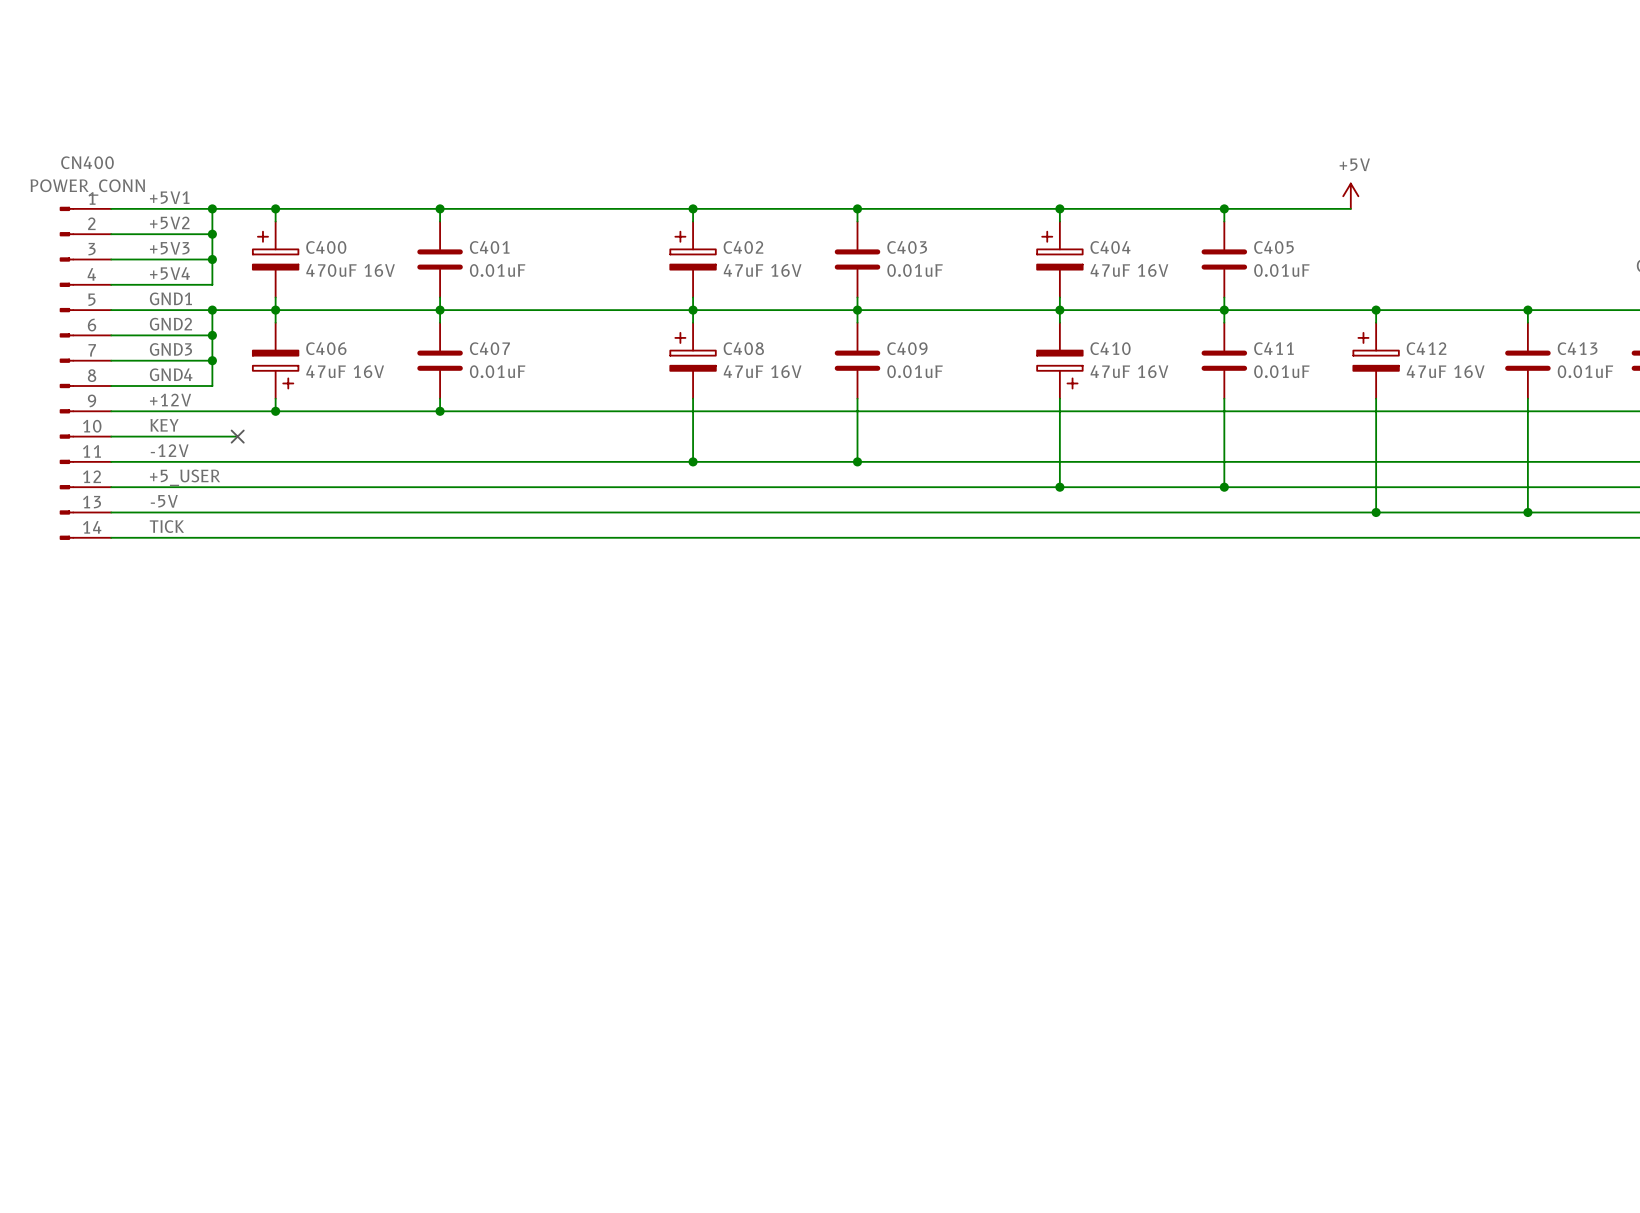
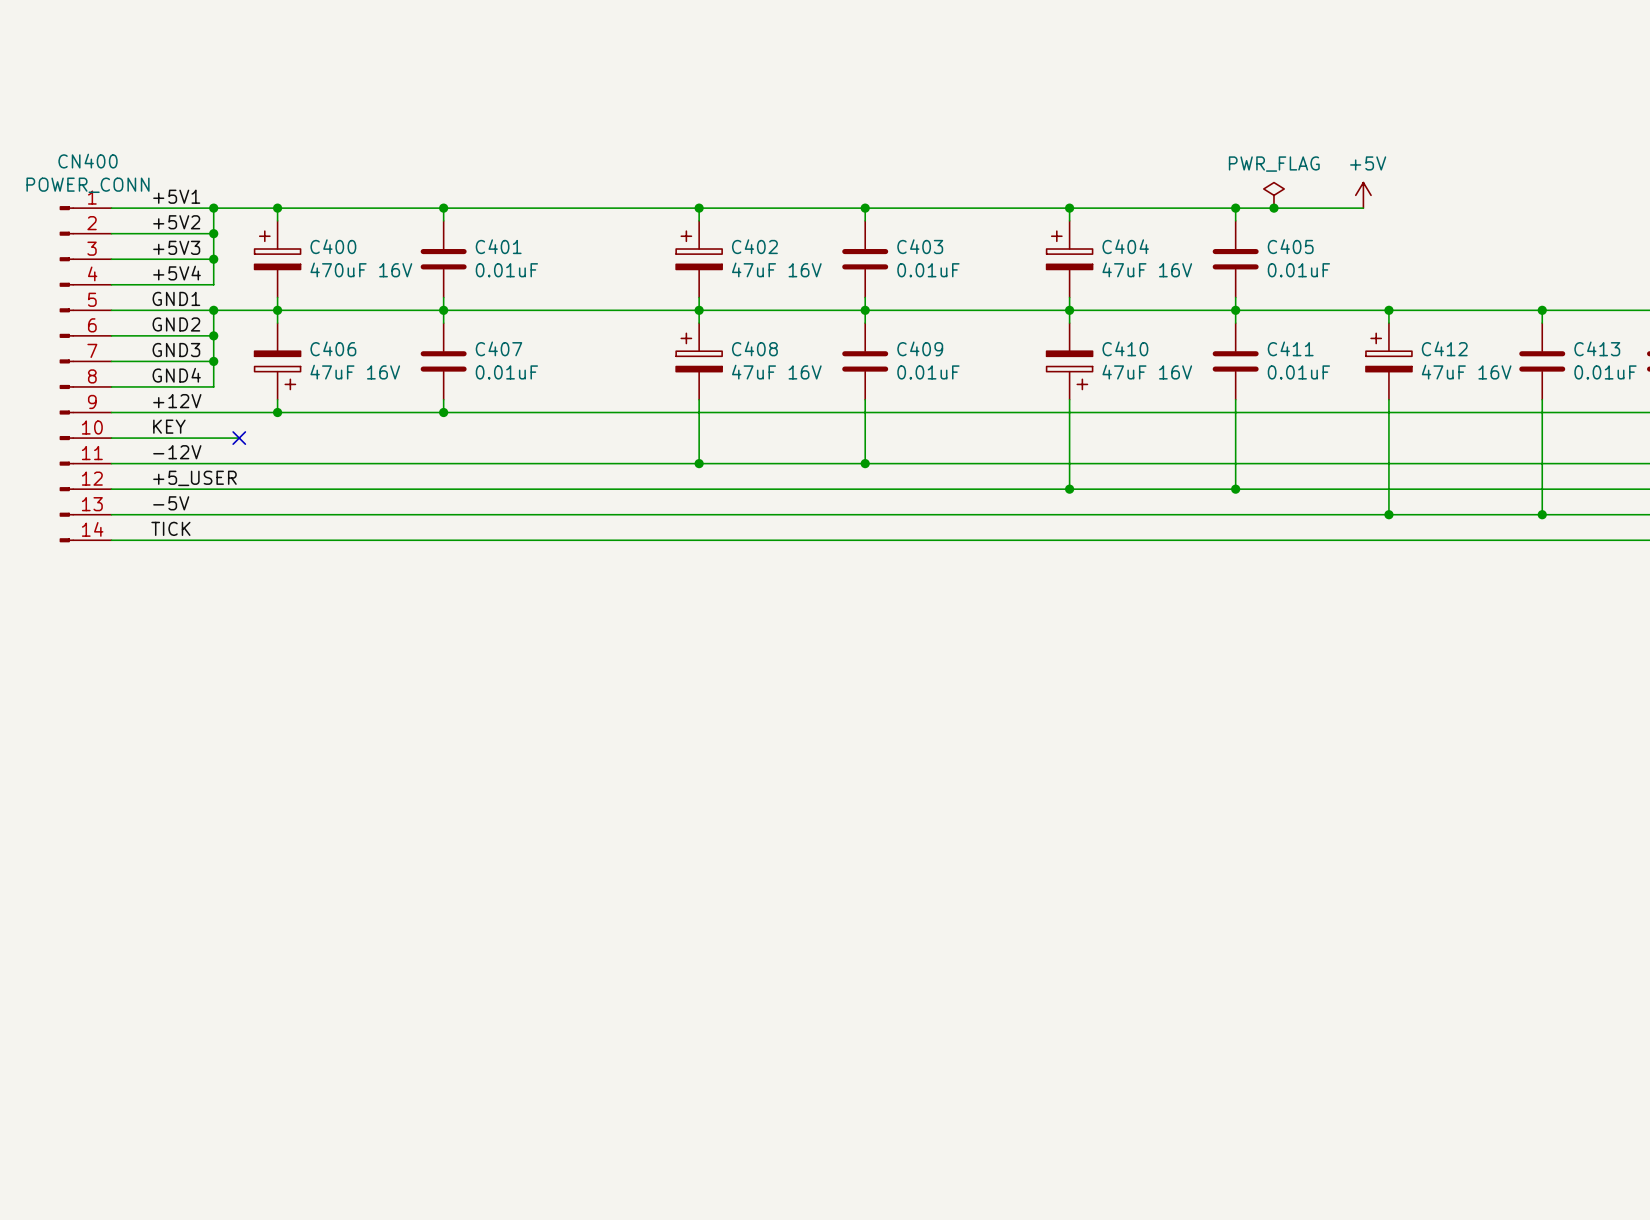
power symbol: none -> PWR_FLAG (1273, 195)
junction: none -> (1273, 208)

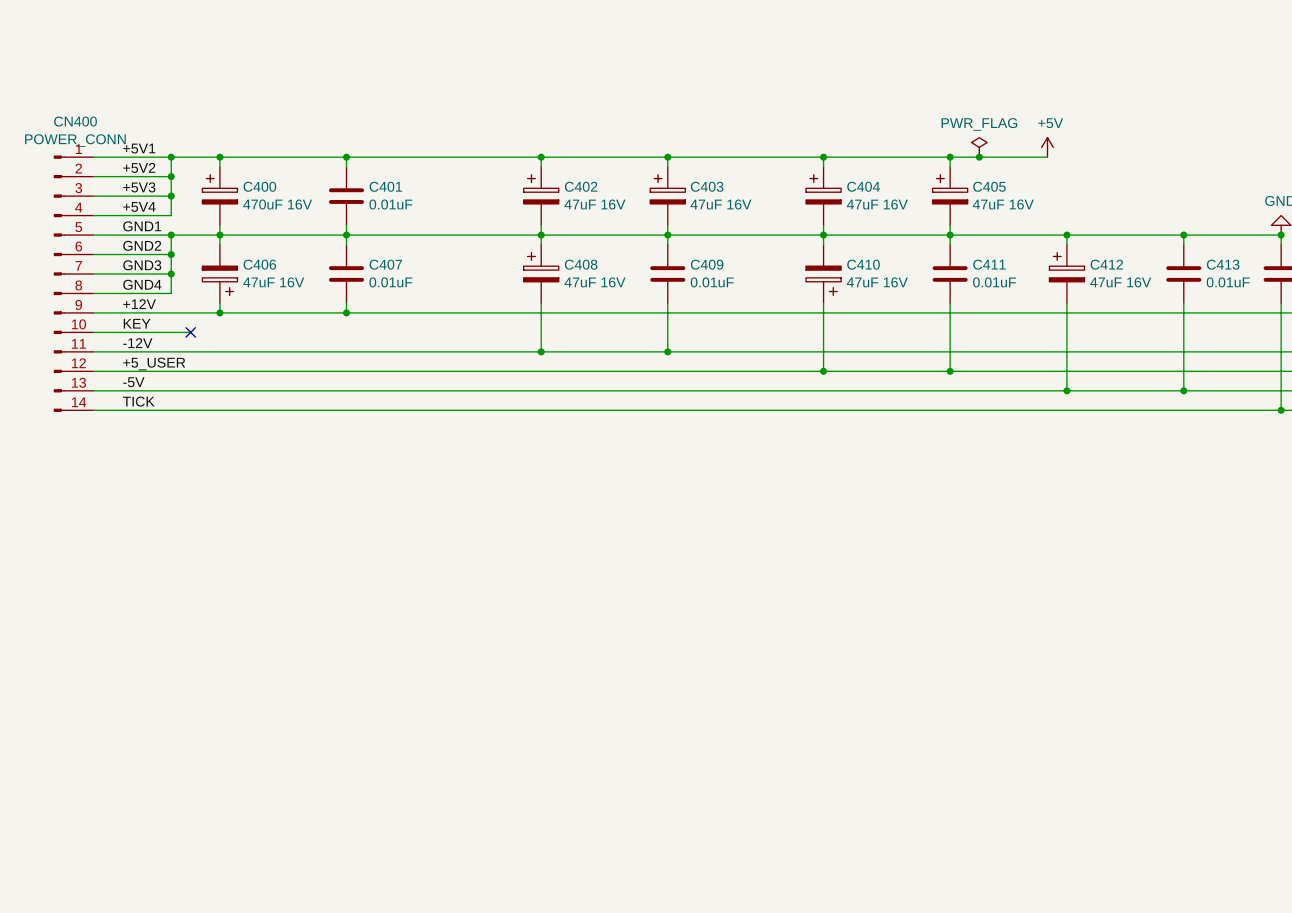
C403 symbol: [842, 220, 889, 298] -> [650, 166, 686, 226]
C405 symbol: [1212, 220, 1259, 298] -> [932, 166, 968, 226]
C403 value: 0.01uF (928, 270) -> 47uF 16V (720, 204)
C405 value: 0.01uF (1298, 270) -> 47uF 16V (1003, 204)

